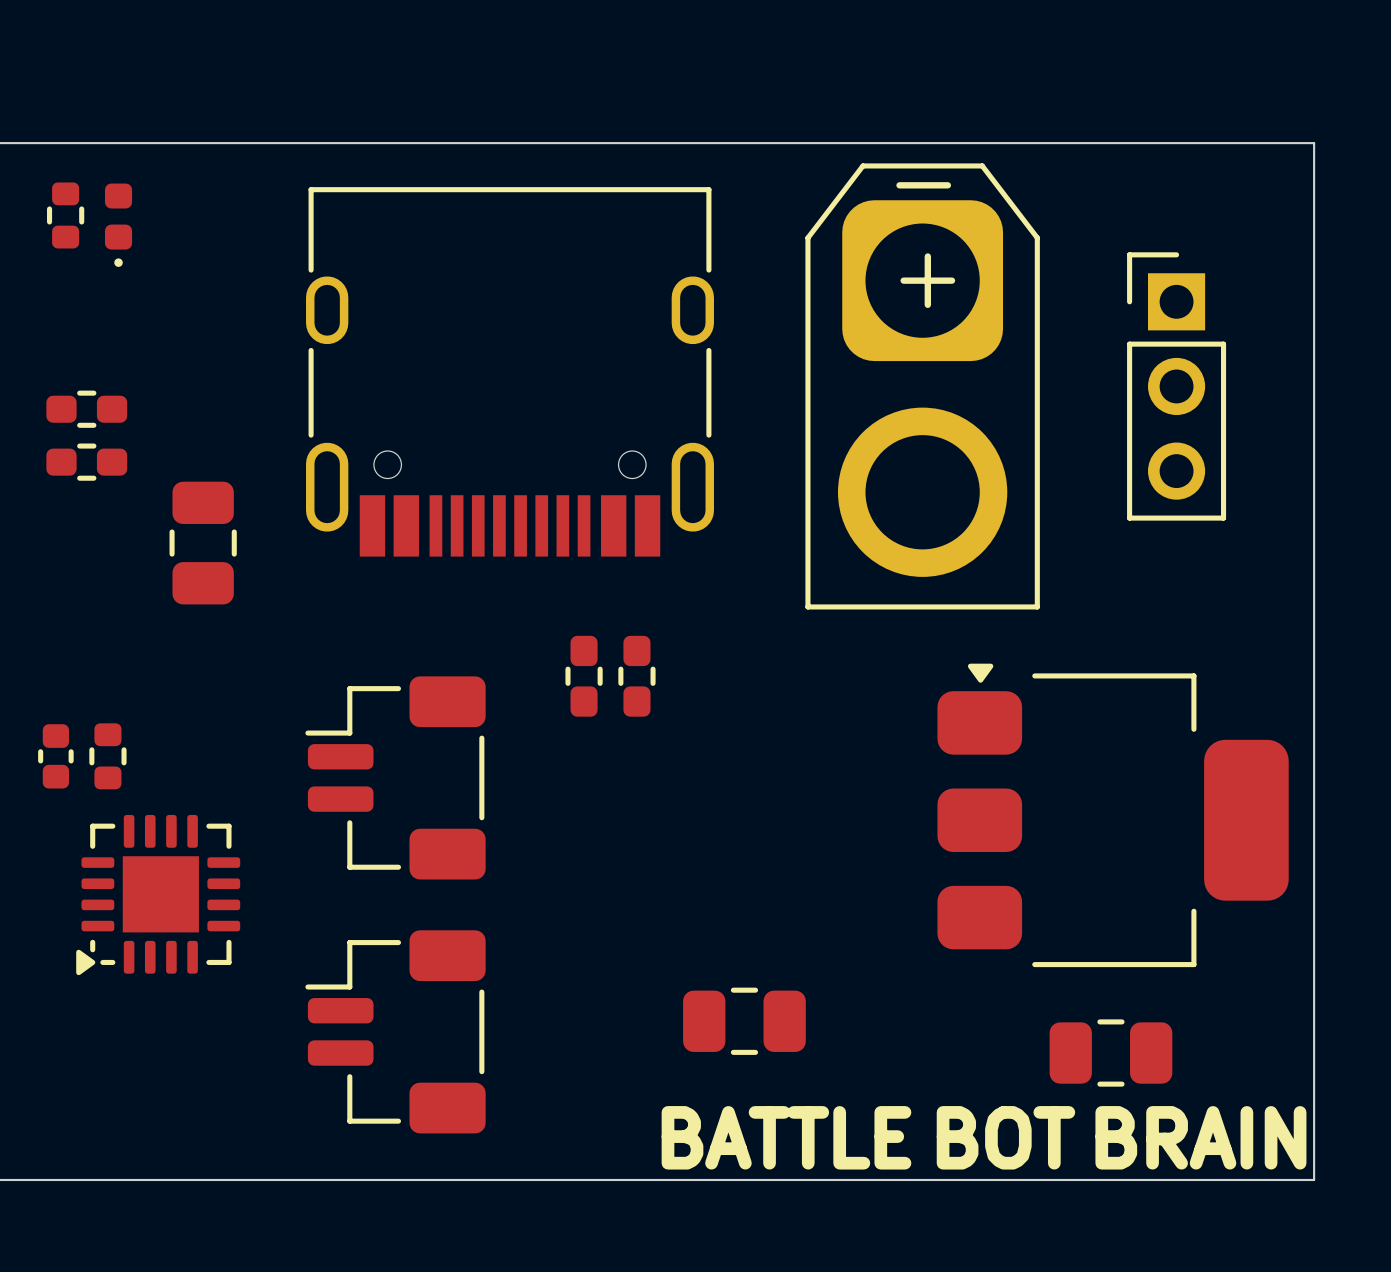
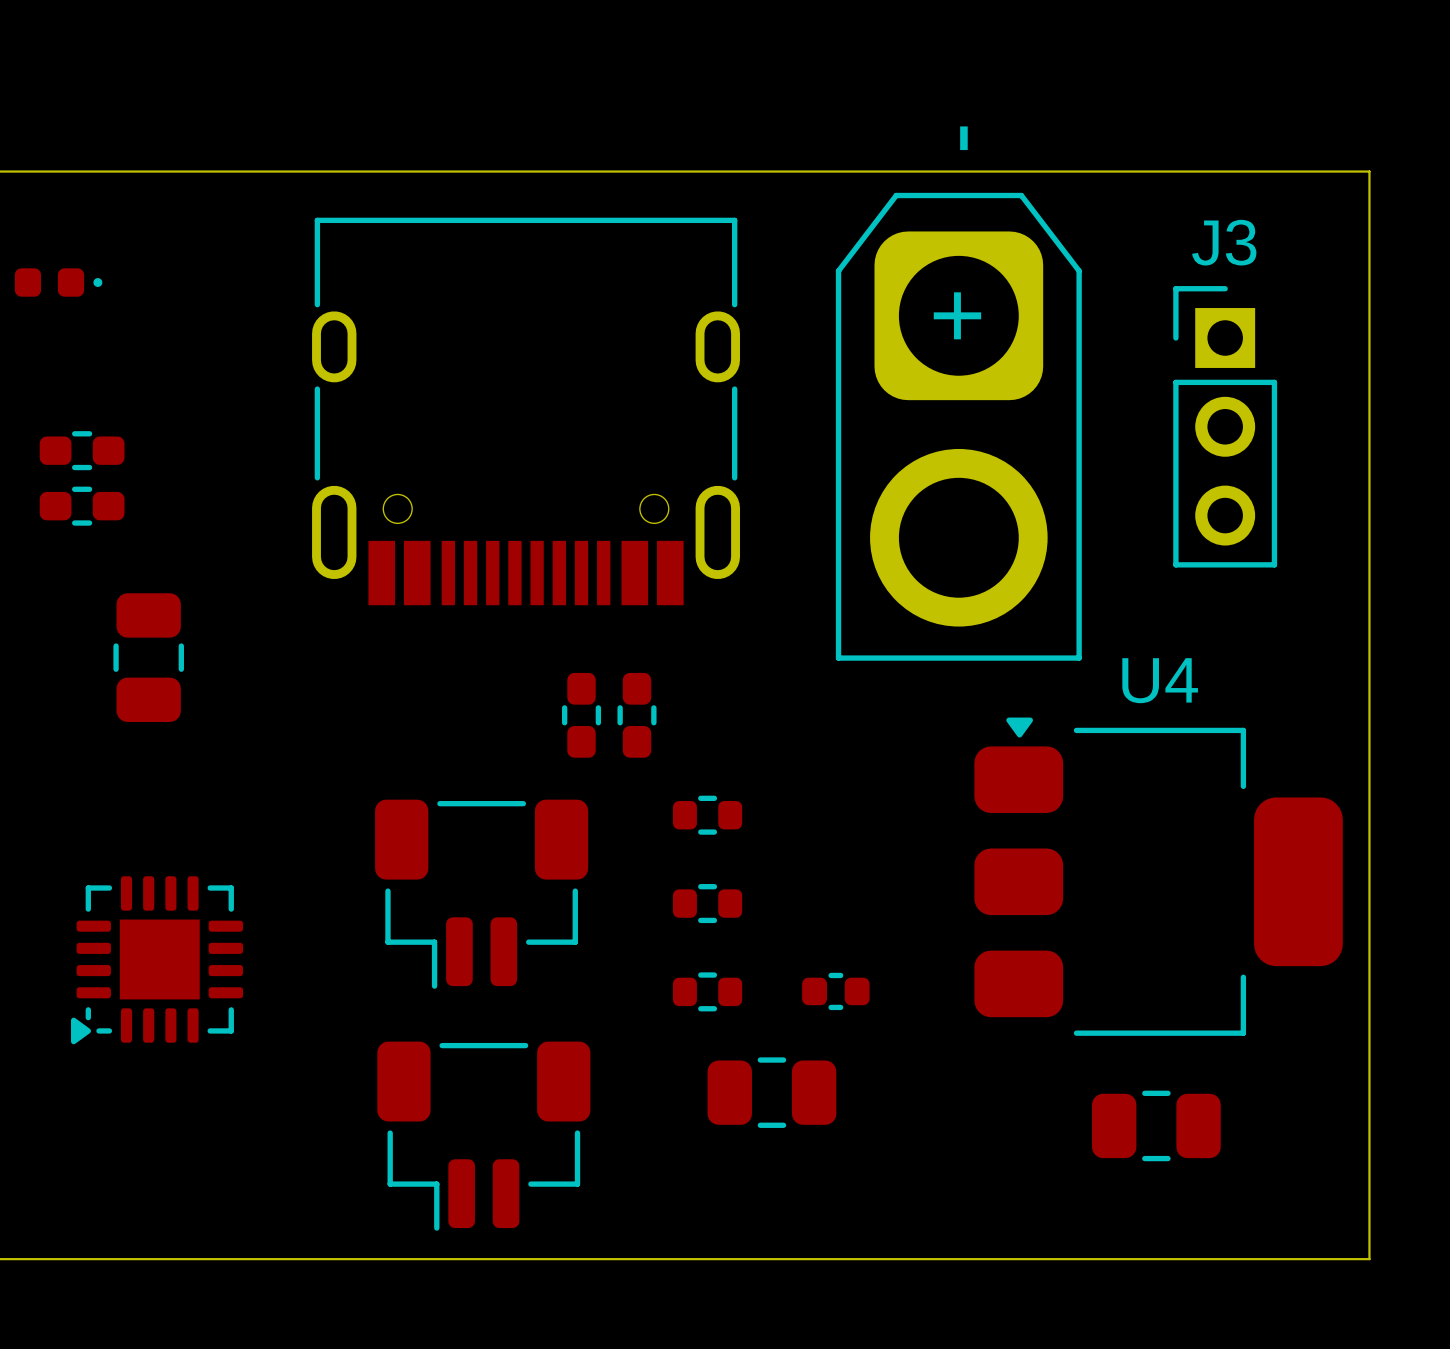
part text rotation: 0° (923, 185) -> 90° counterclockwise (963, 138)
J3 name: none -> J3 (1224, 242)
part: (65, 215) -> none
part rotation: 0° (118, 225) -> 90° counterclockwise (58, 282)
part position: (118, 225) -> (58, 282)
part position: (203, 543) -> (148, 657)
U4 name: none -> U4 (1160, 680)
part: none -> (581, 715)
part: none -> (637, 715)
part: (584, 676) -> none
part: (636, 676) -> none
part rotation: 0° (55, 756) -> 90° clockwise (835, 991)
part position: (55, 756) -> (835, 991)
part: (107, 756) -> none
part: none -> (707, 815)
part rotation: 0° (395, 777) -> 90° counterclockwise (481, 894)
part: none -> (707, 903)
part: none -> (707, 991)
part rotation: 0° (395, 1031) -> 90° counterclockwise (483, 1136)
text: BATTLE (786, 1137) -> none
text: BOT (1005, 1137) -> none
text: BRAIN (1200, 1137) -> none

